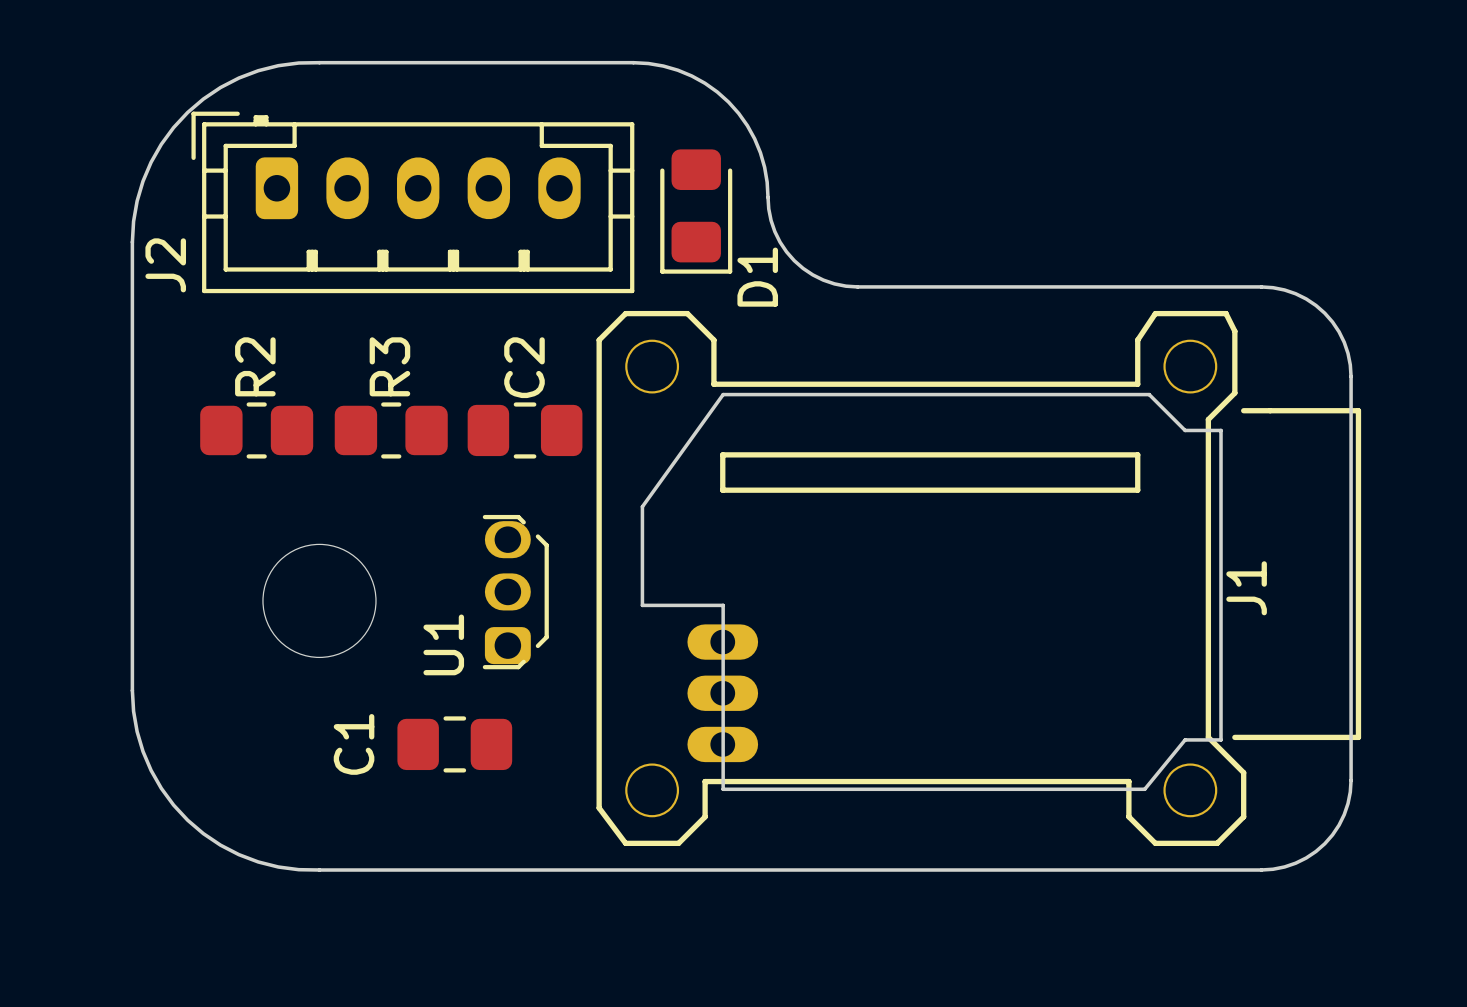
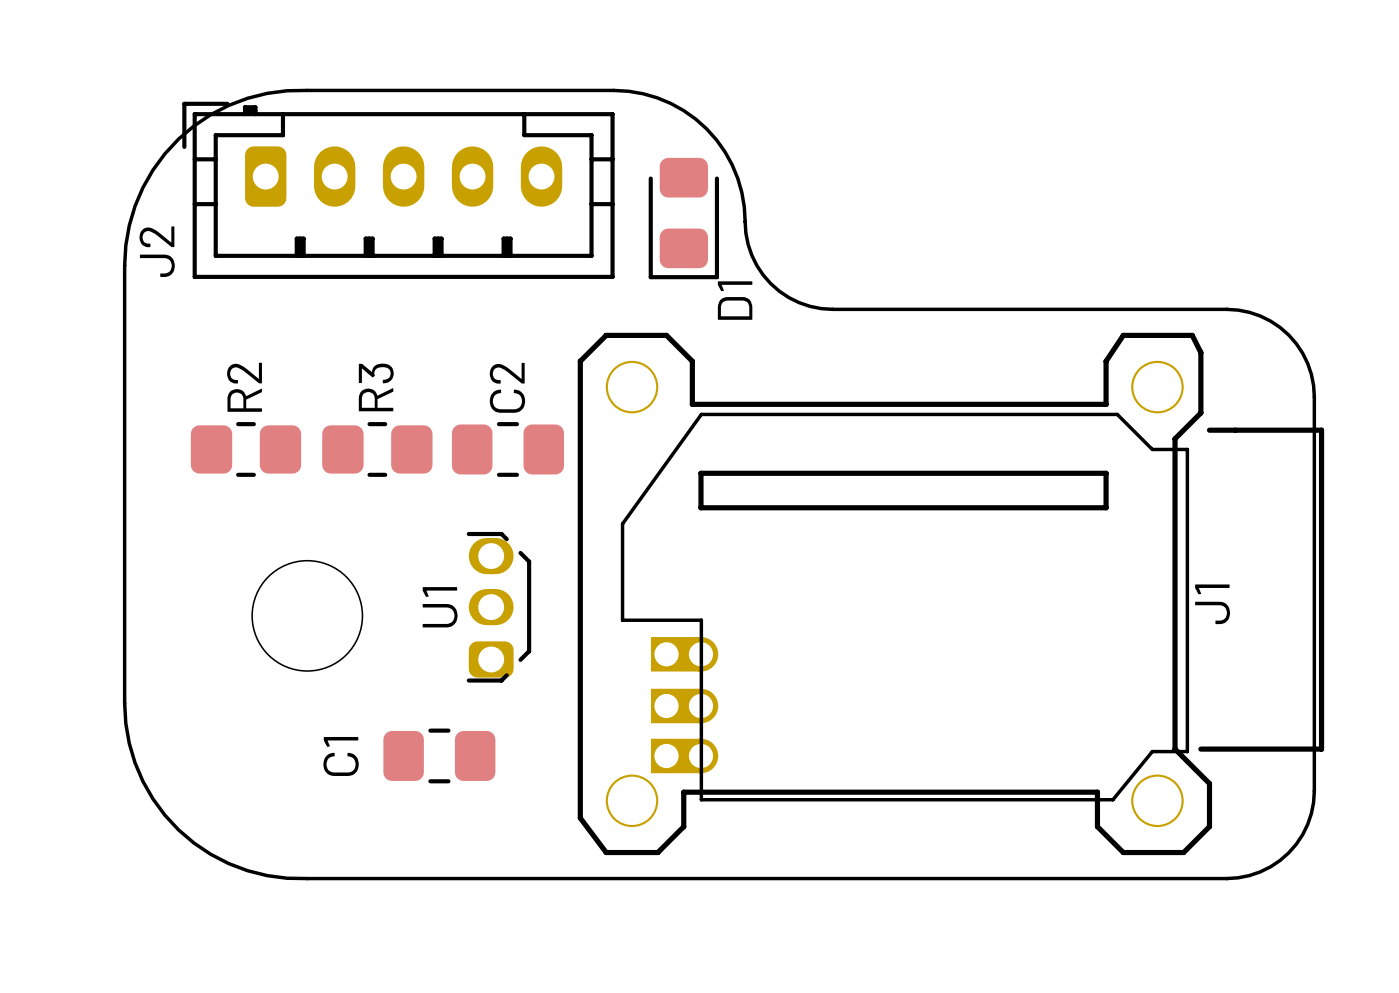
J2 position: (412, 202) -> (398, 190)
D1 position: (696, 211) -> (683, 218)
J1 footprint: [596, 310, 1362, 847] -> [577, 332, 1325, 856]
U1 name position: U1 (443, 644) -> U1 (440, 607)

